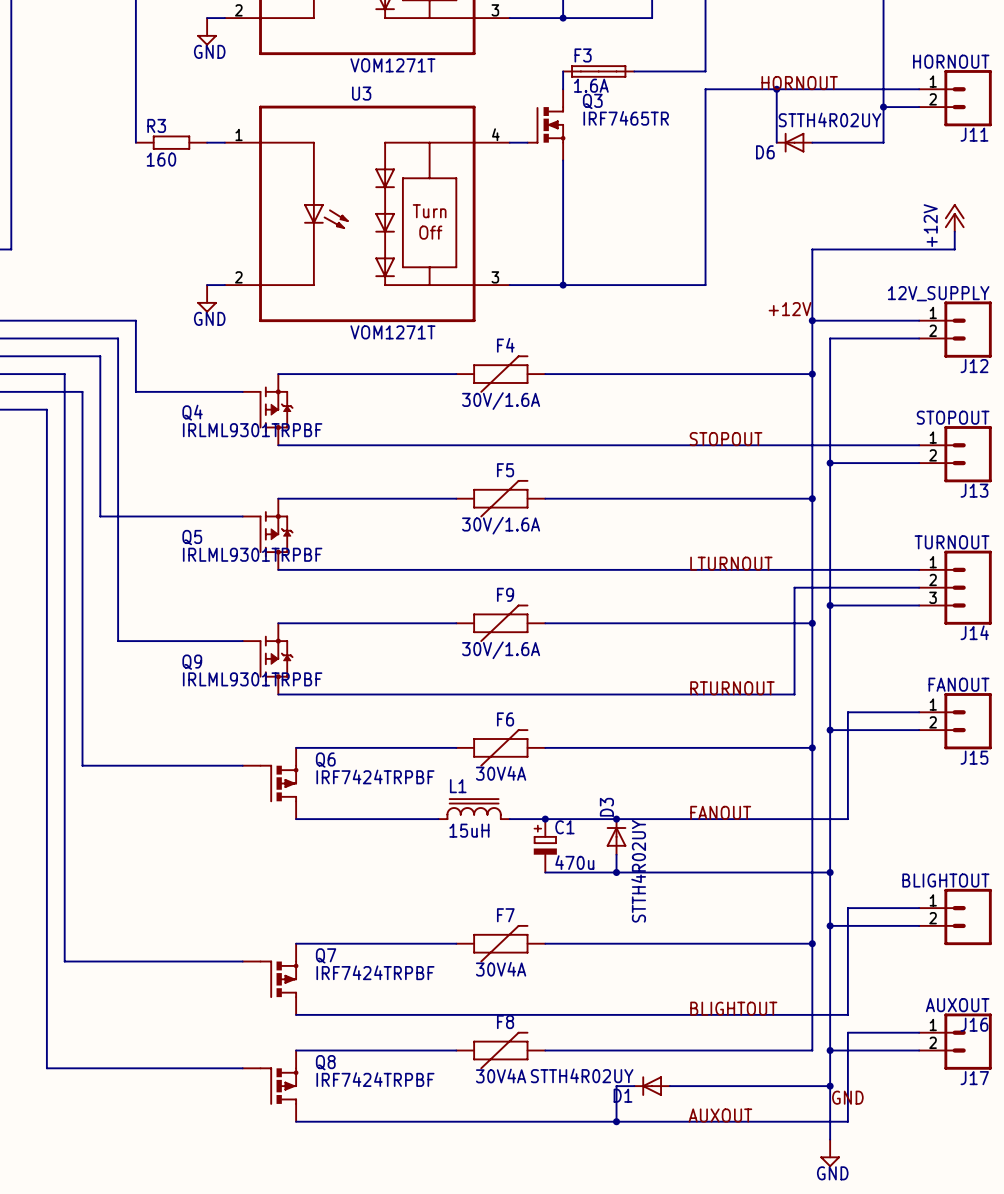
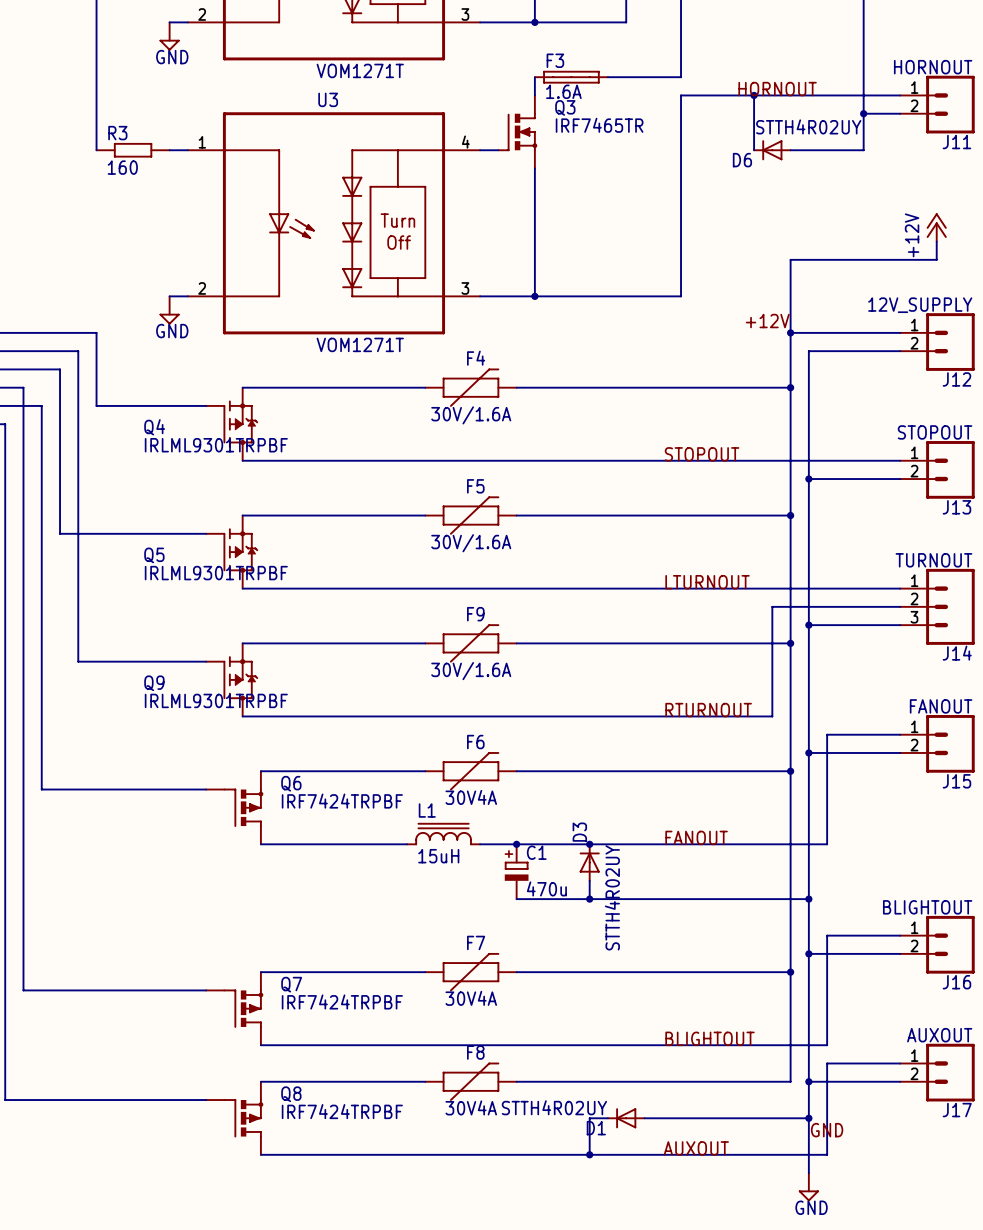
J16 name position: J16 (974, 1024) -> J16 (956, 982)

